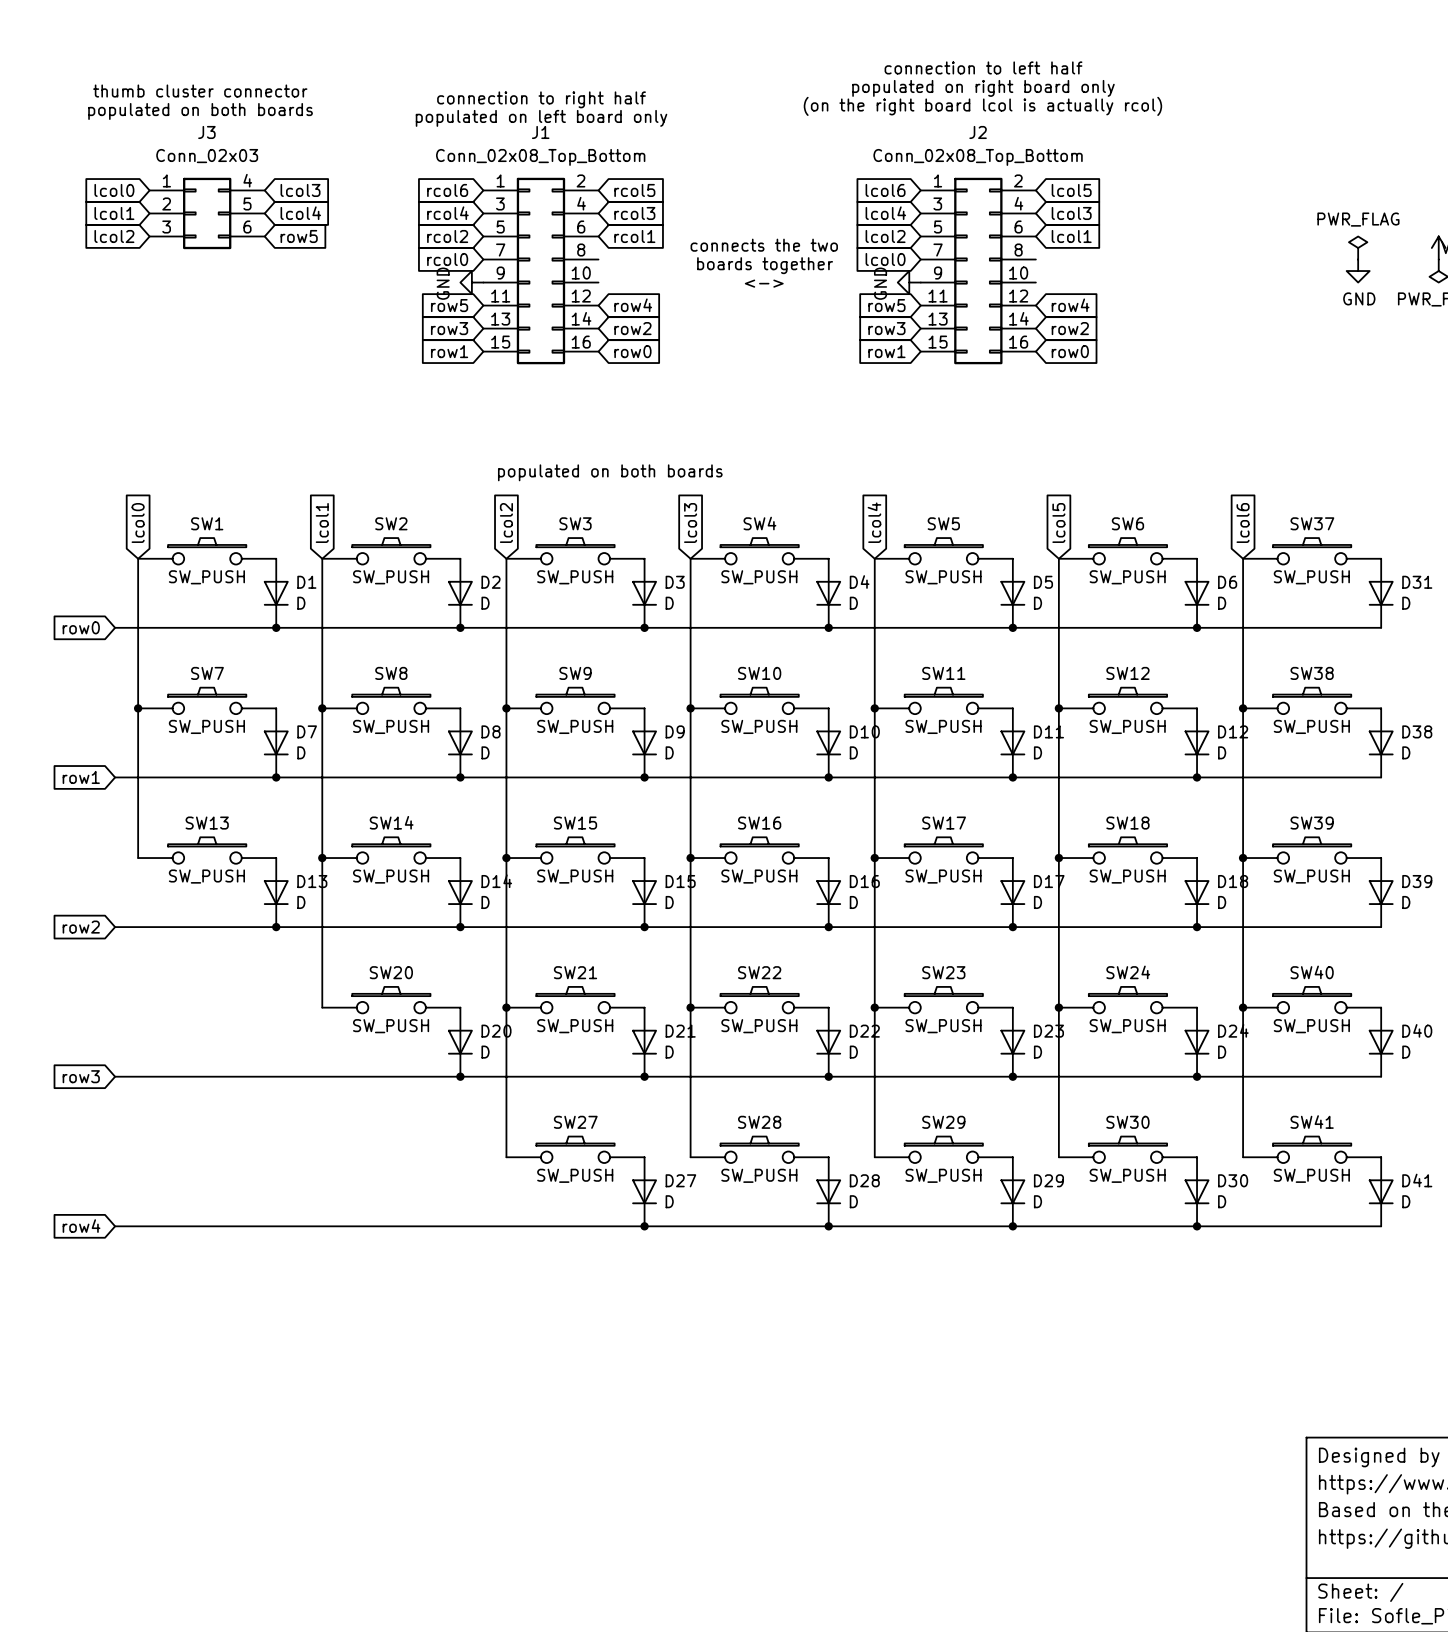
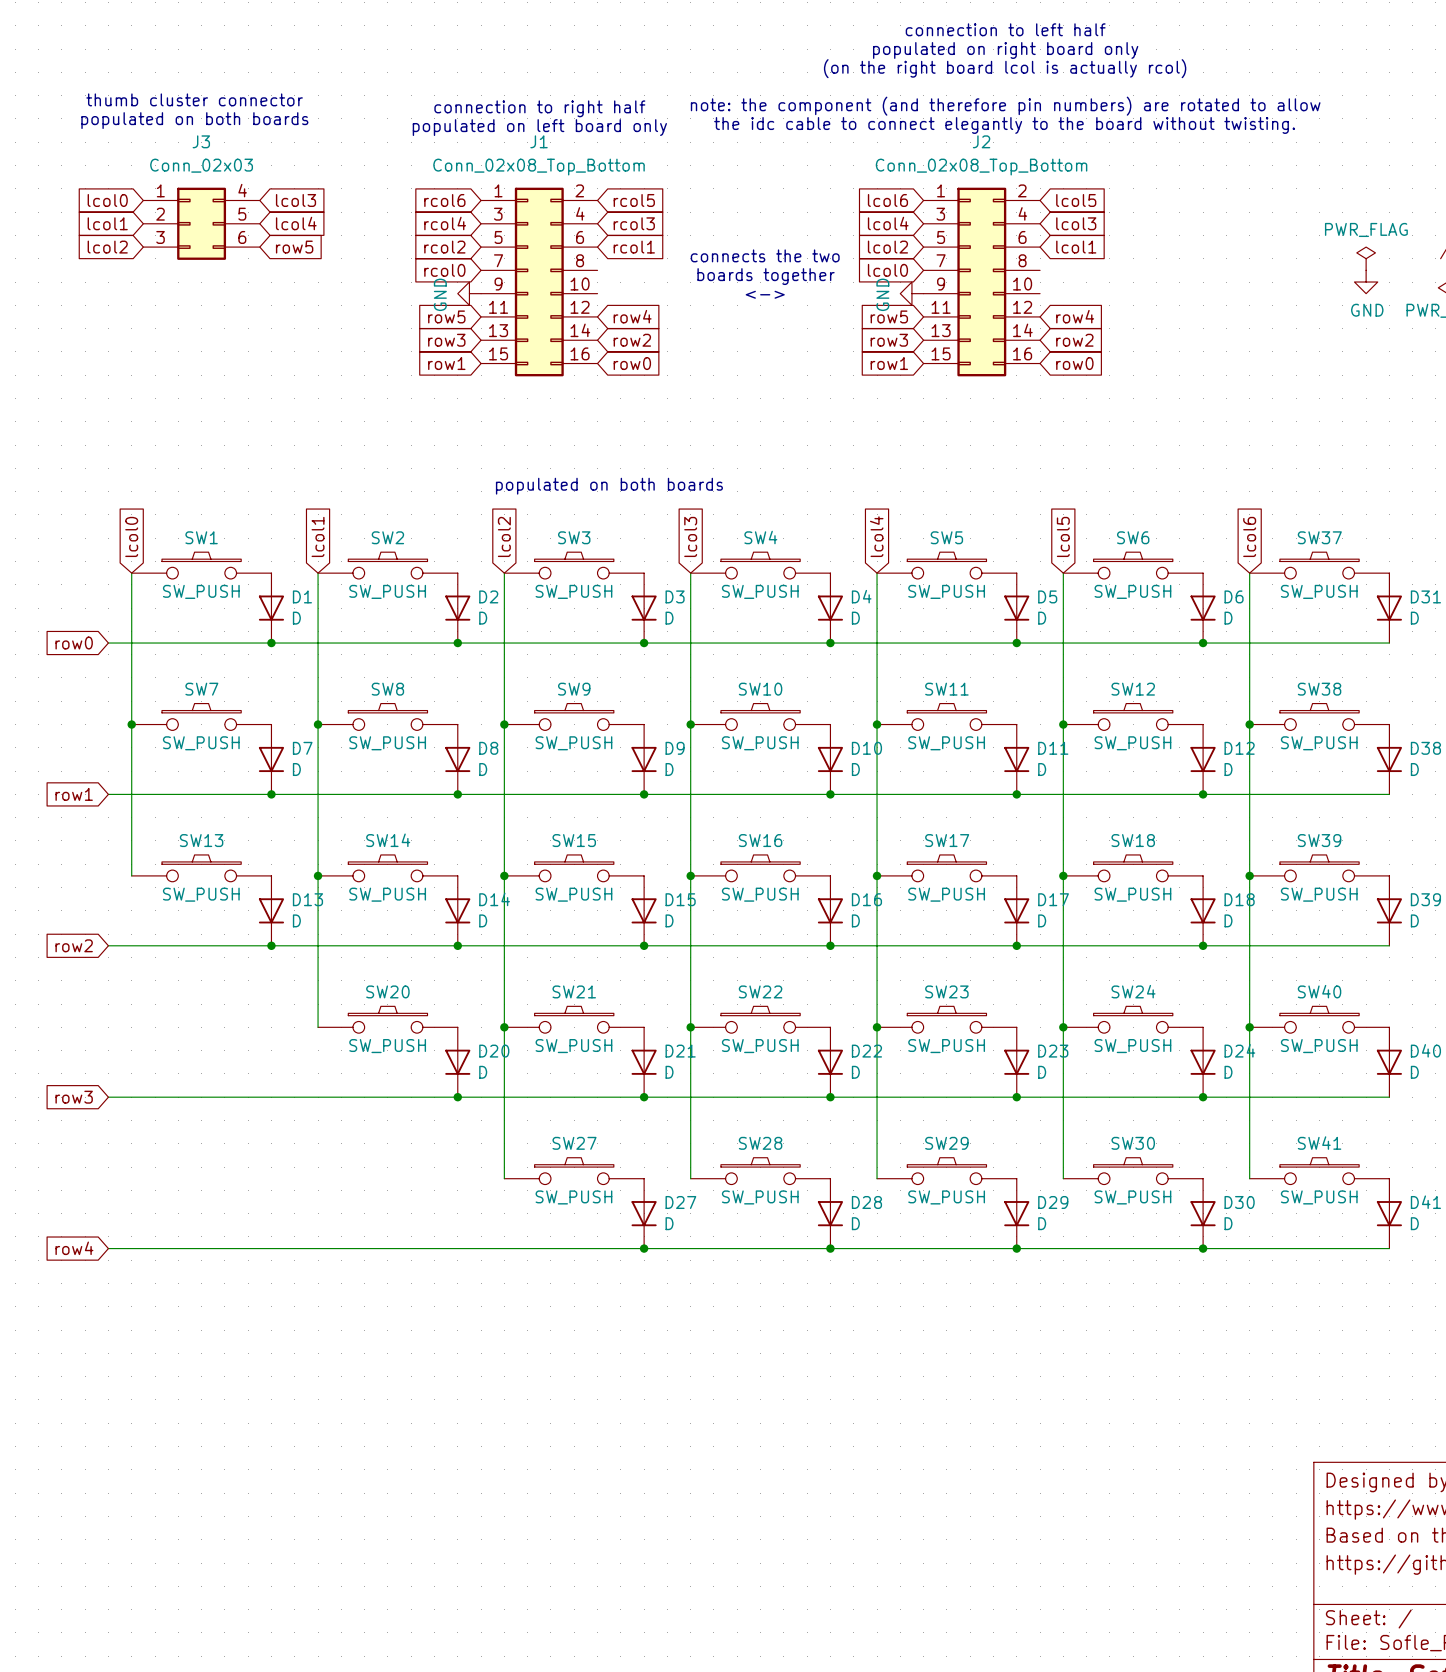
text position: connection to left half (983, 67) -> connection to left half (1005, 29)
text position: populated on right board only (983, 88) -> populated on right board only (1005, 50)
text: none -> note: the component (and therefore pin numbers) are rotated to allow (1005, 106)
text position: (on the right board lcol is actually rcol) (982, 106) -> (on the right board lcol is actually rcol) (1005, 68)
text: none -> the idc cable to connect elegantly to the board without twisting. (1004, 125)

